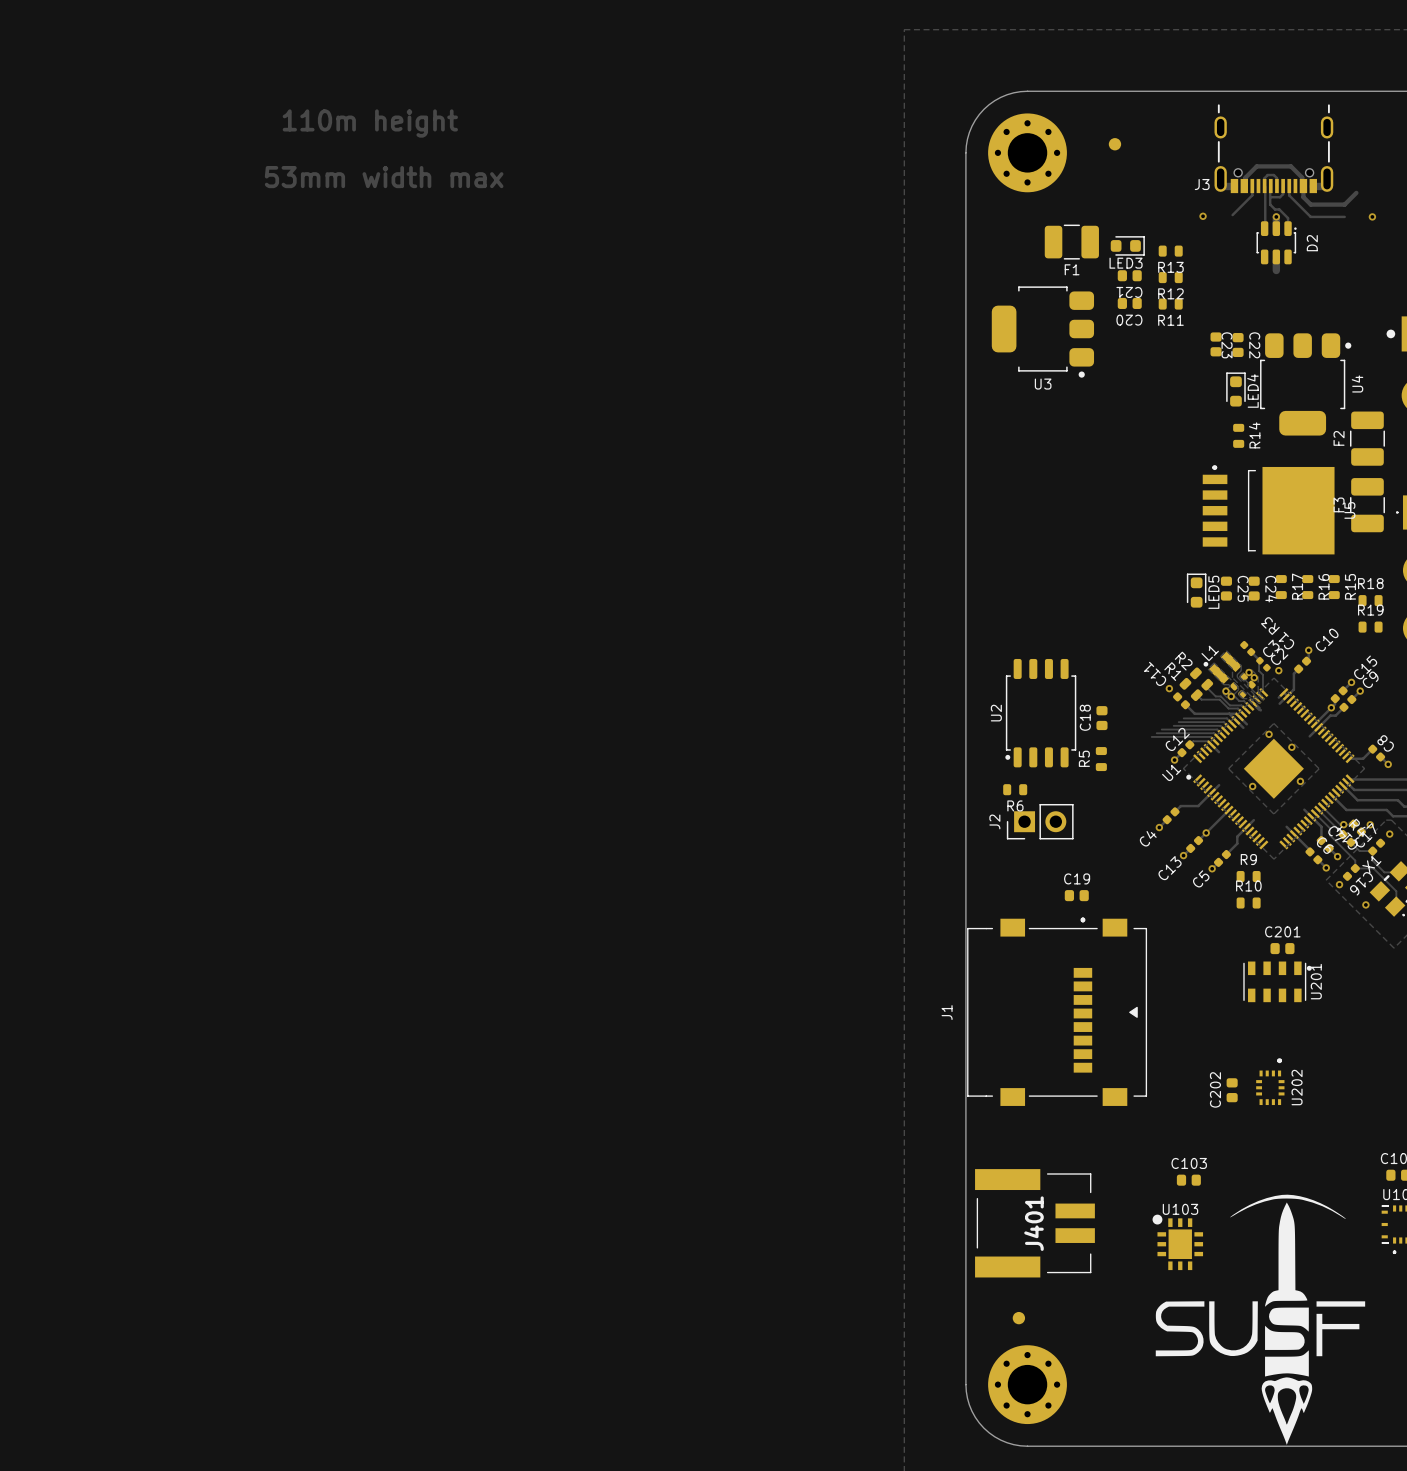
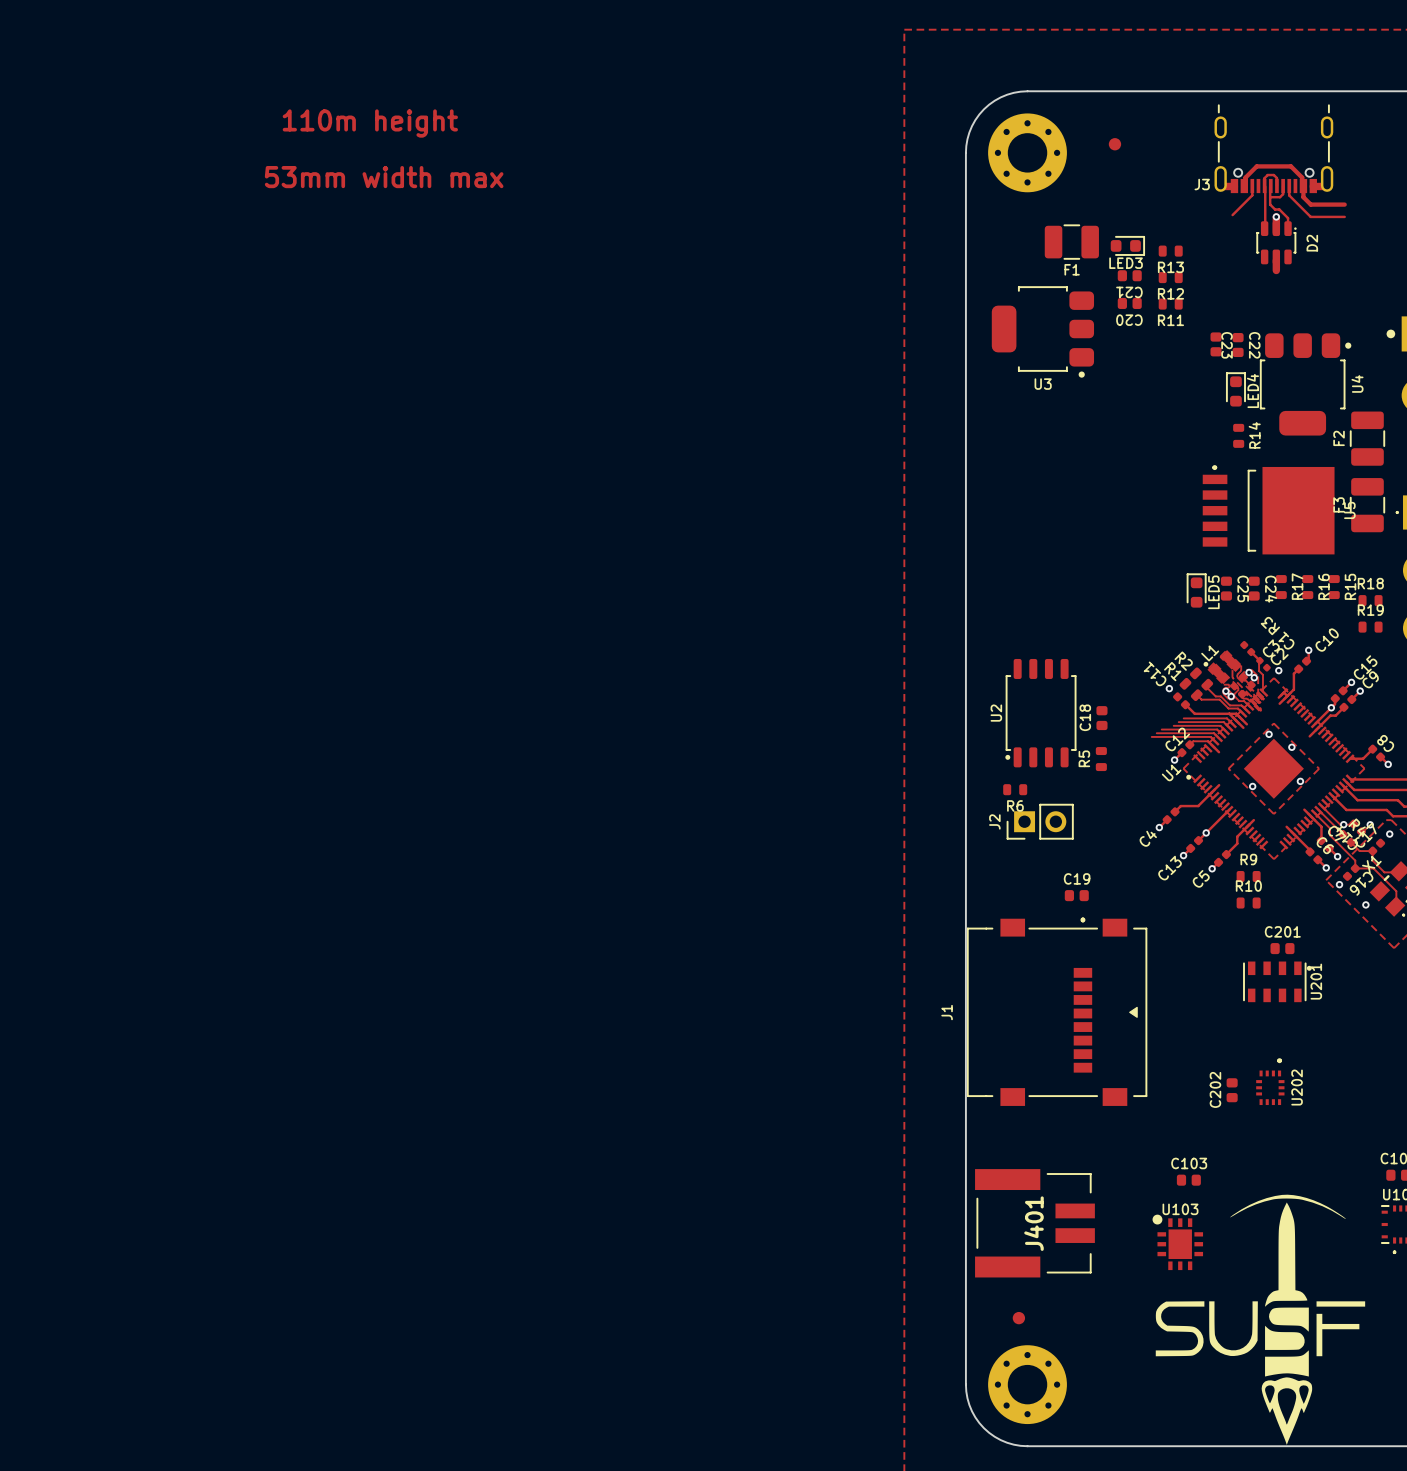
track: (1356, 192) (1344, 204) -> none
via: (1203, 216) -> none
via: (1372, 216) -> none

